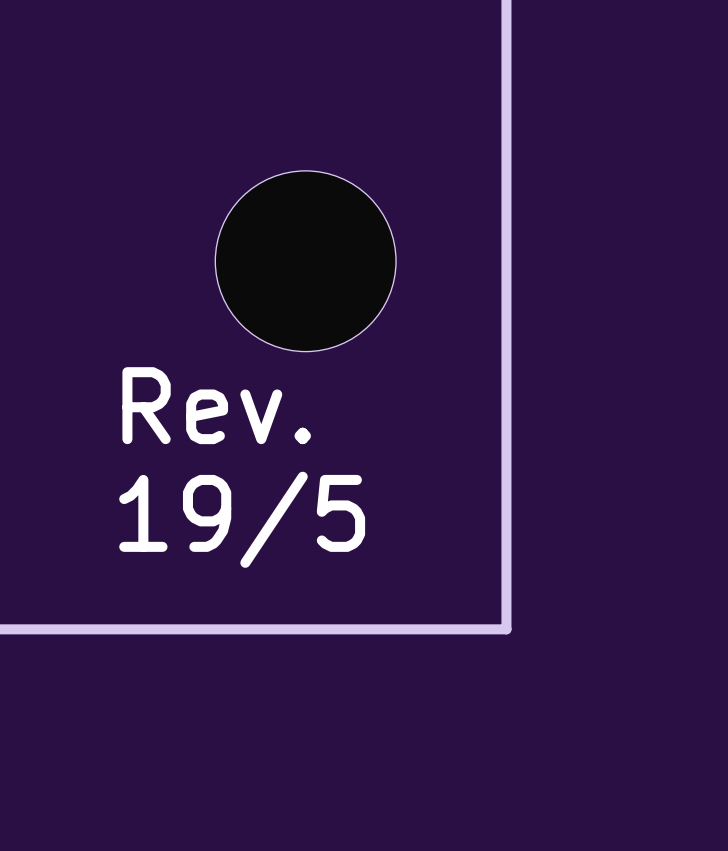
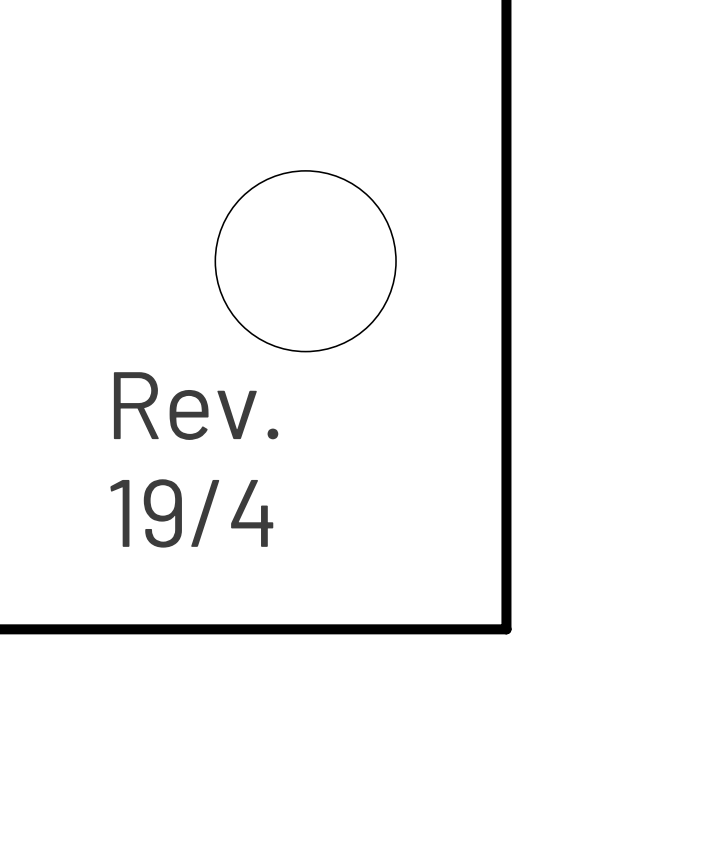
text: 19/5 (242, 519) -> 19/4 (191, 513)

